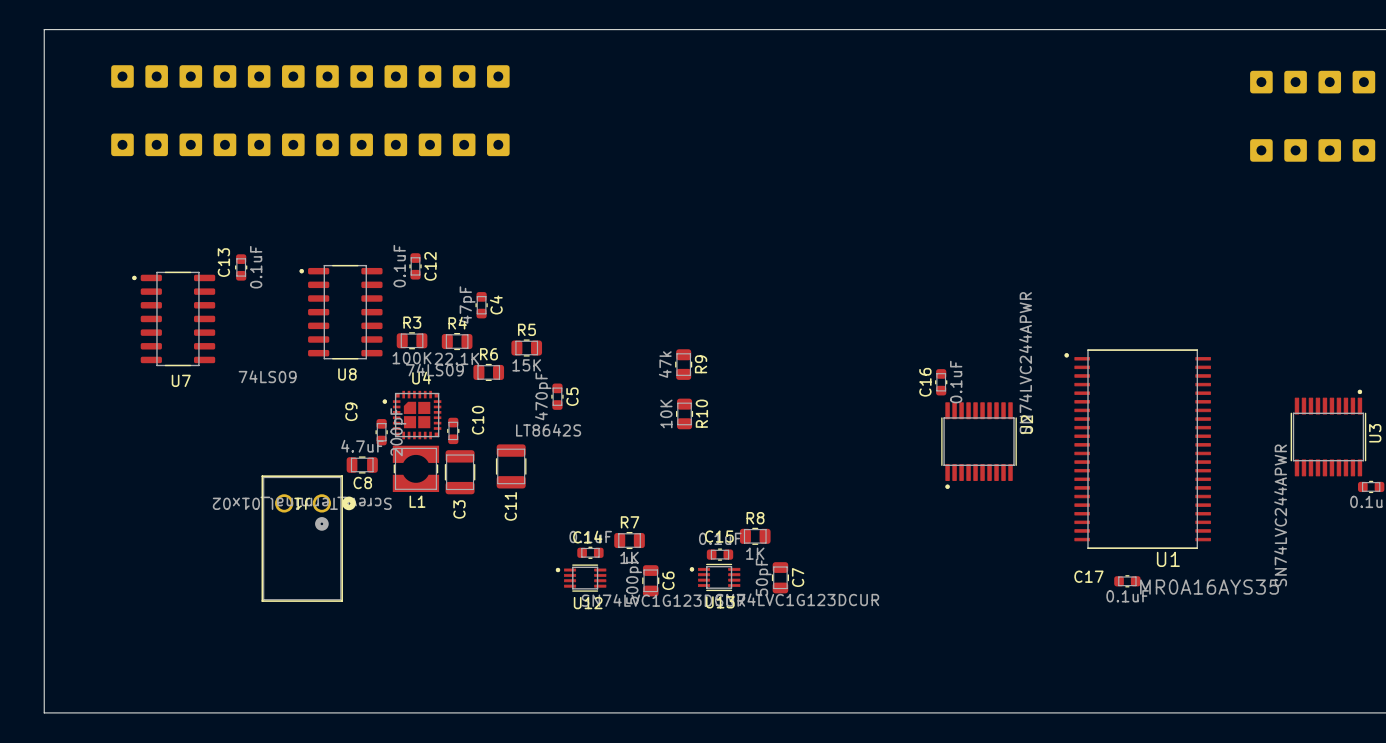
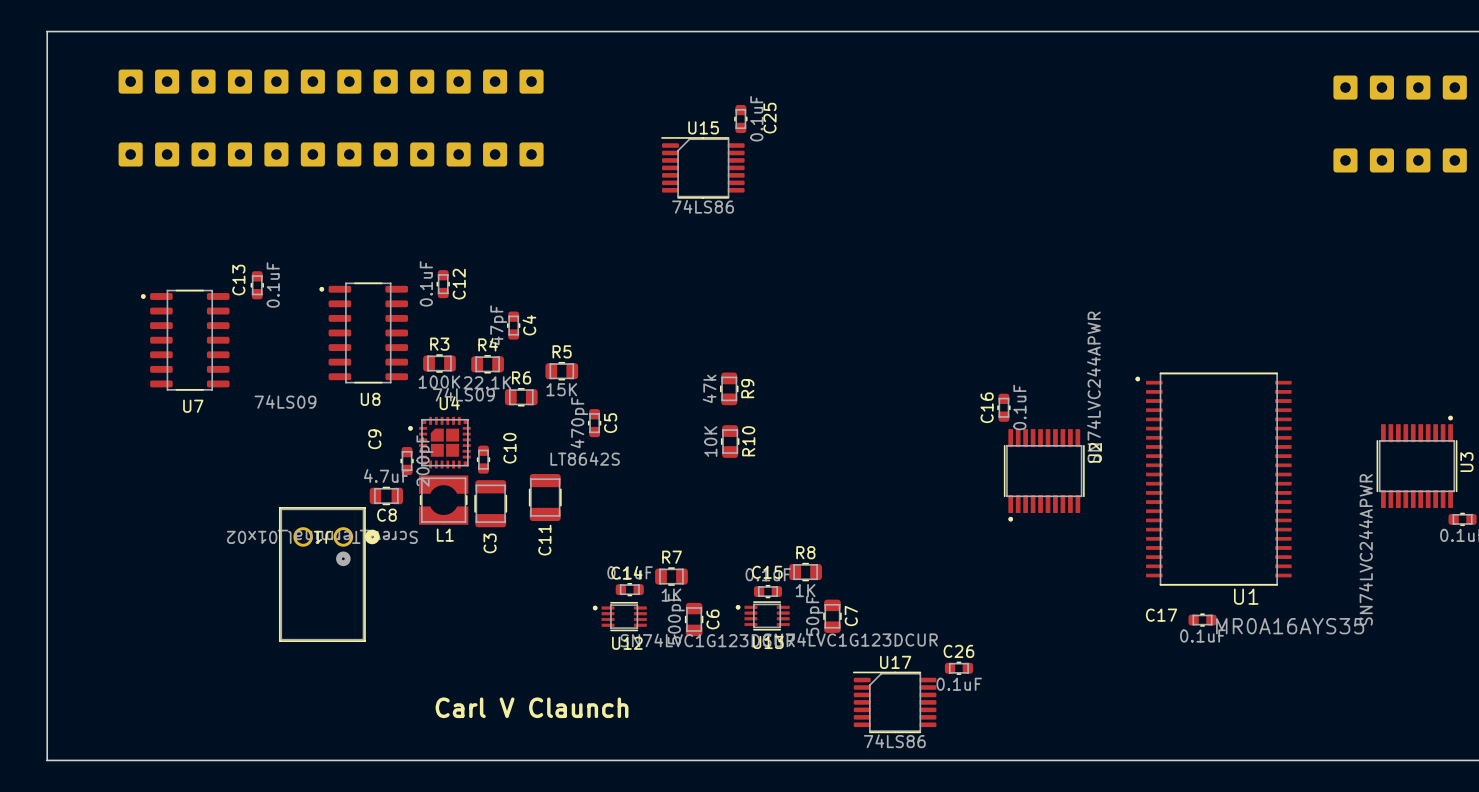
C25: none -> 0.1uF (740, 119)
U15: none -> 74LS86 (702, 167)
C26: none -> 0.1uF (958, 668)
U17: none -> 74LS86 (894, 702)
text: none -> Carl V Claunch (532, 707)

